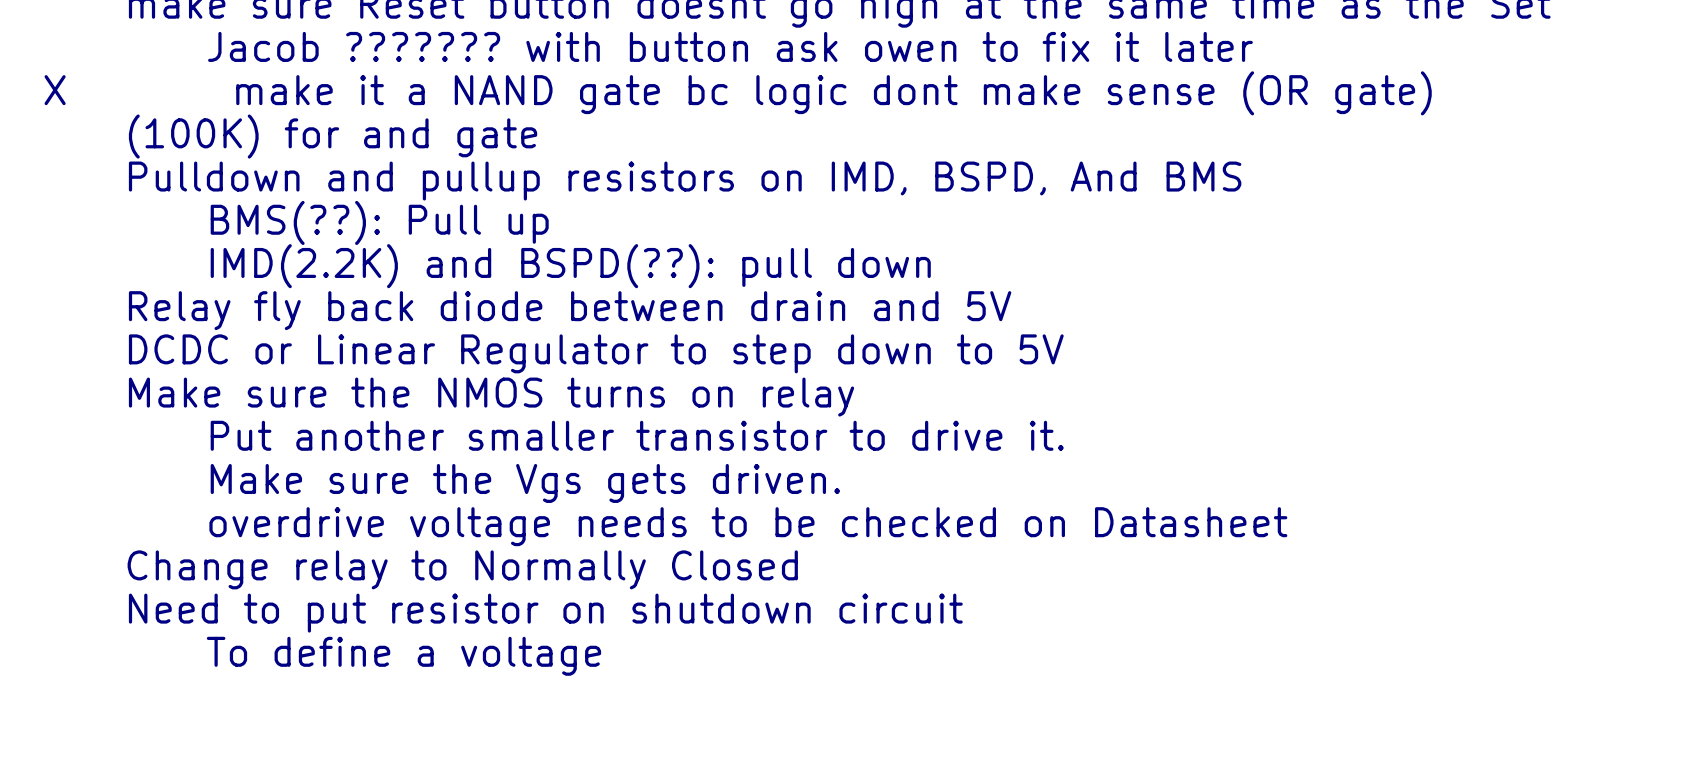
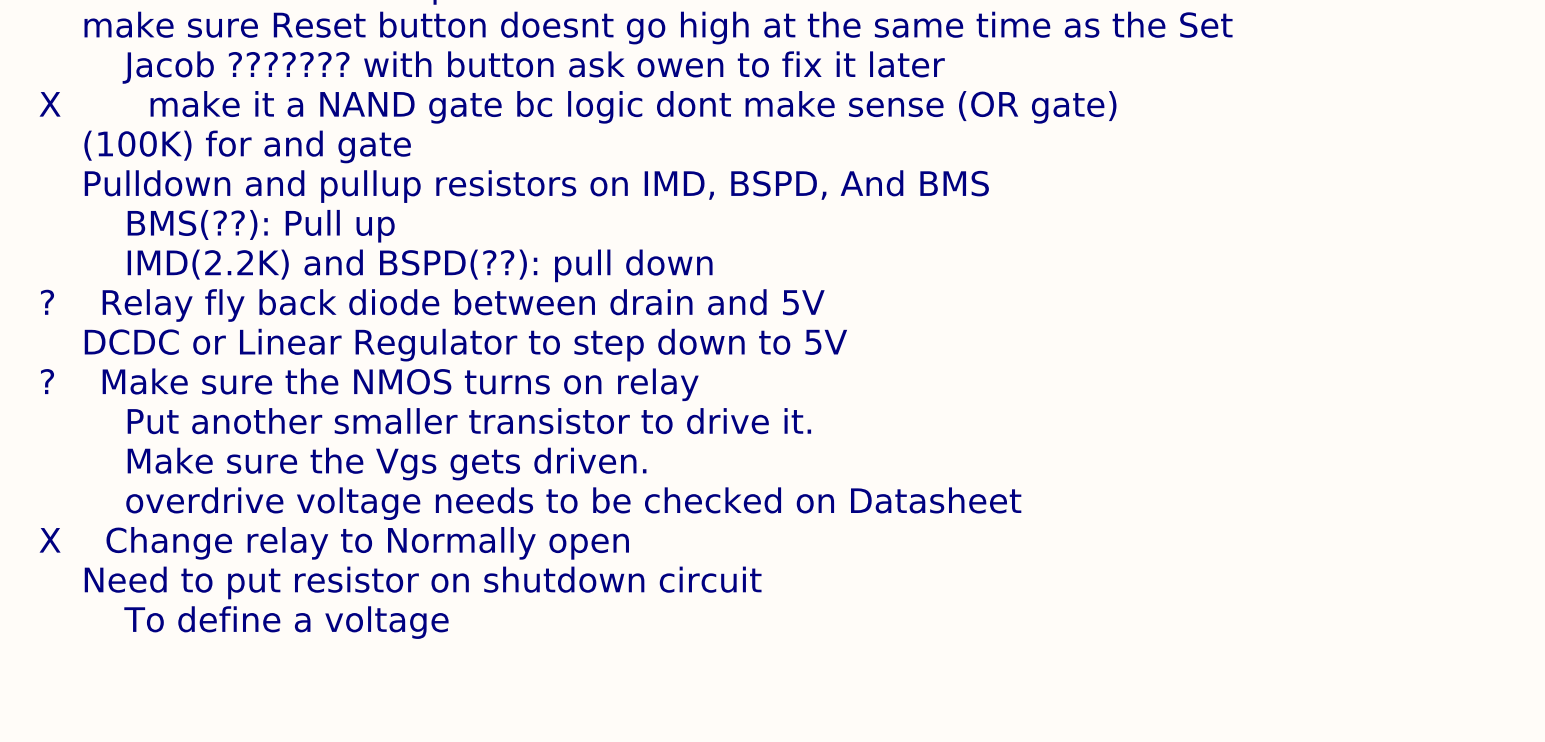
text: Relay fly back diode between drain and 5V (570, 310) -> ? Relay fly back diode between drain and 5V (432, 305)
text: Make sure the NMOS turns on relay (491, 397) -> ? Make sure the NMOS turns on relay (369, 384)
text: Change relay to Normally Closed (462, 569) -> X Change relay to Normally open (334, 543)

